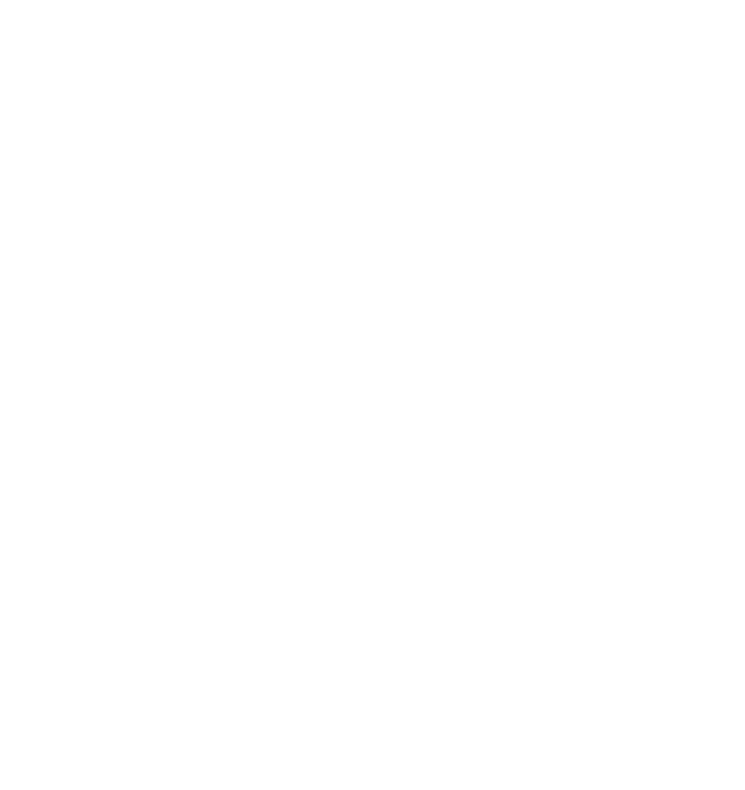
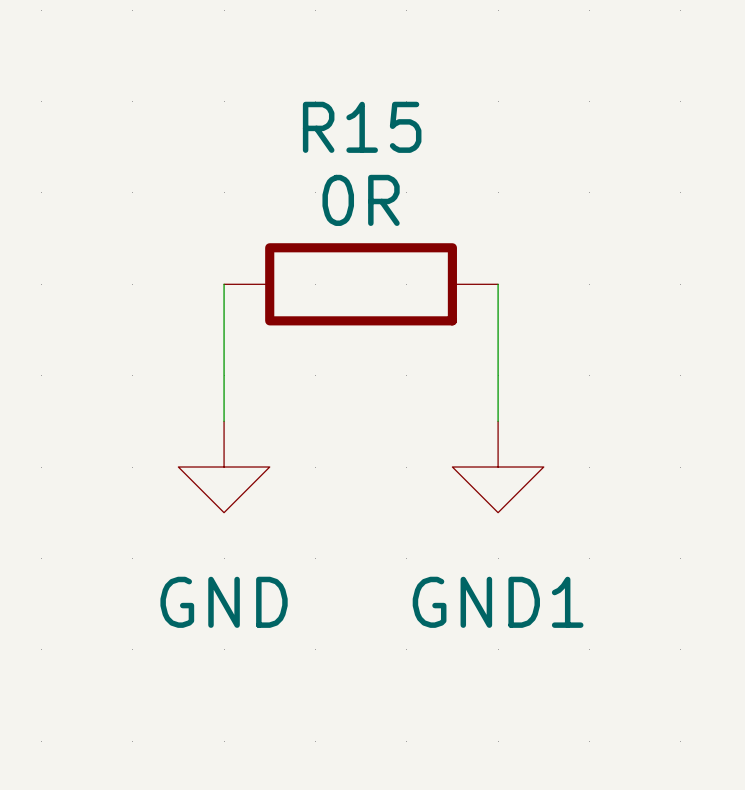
wire: none -> (224, 284) (224, 421)
R15: none -> 0R (361, 284)
wire: none -> (498, 284) (498, 421)
power symbol: none -> GND (224, 467)
power symbol: none -> GND1 (498, 467)

